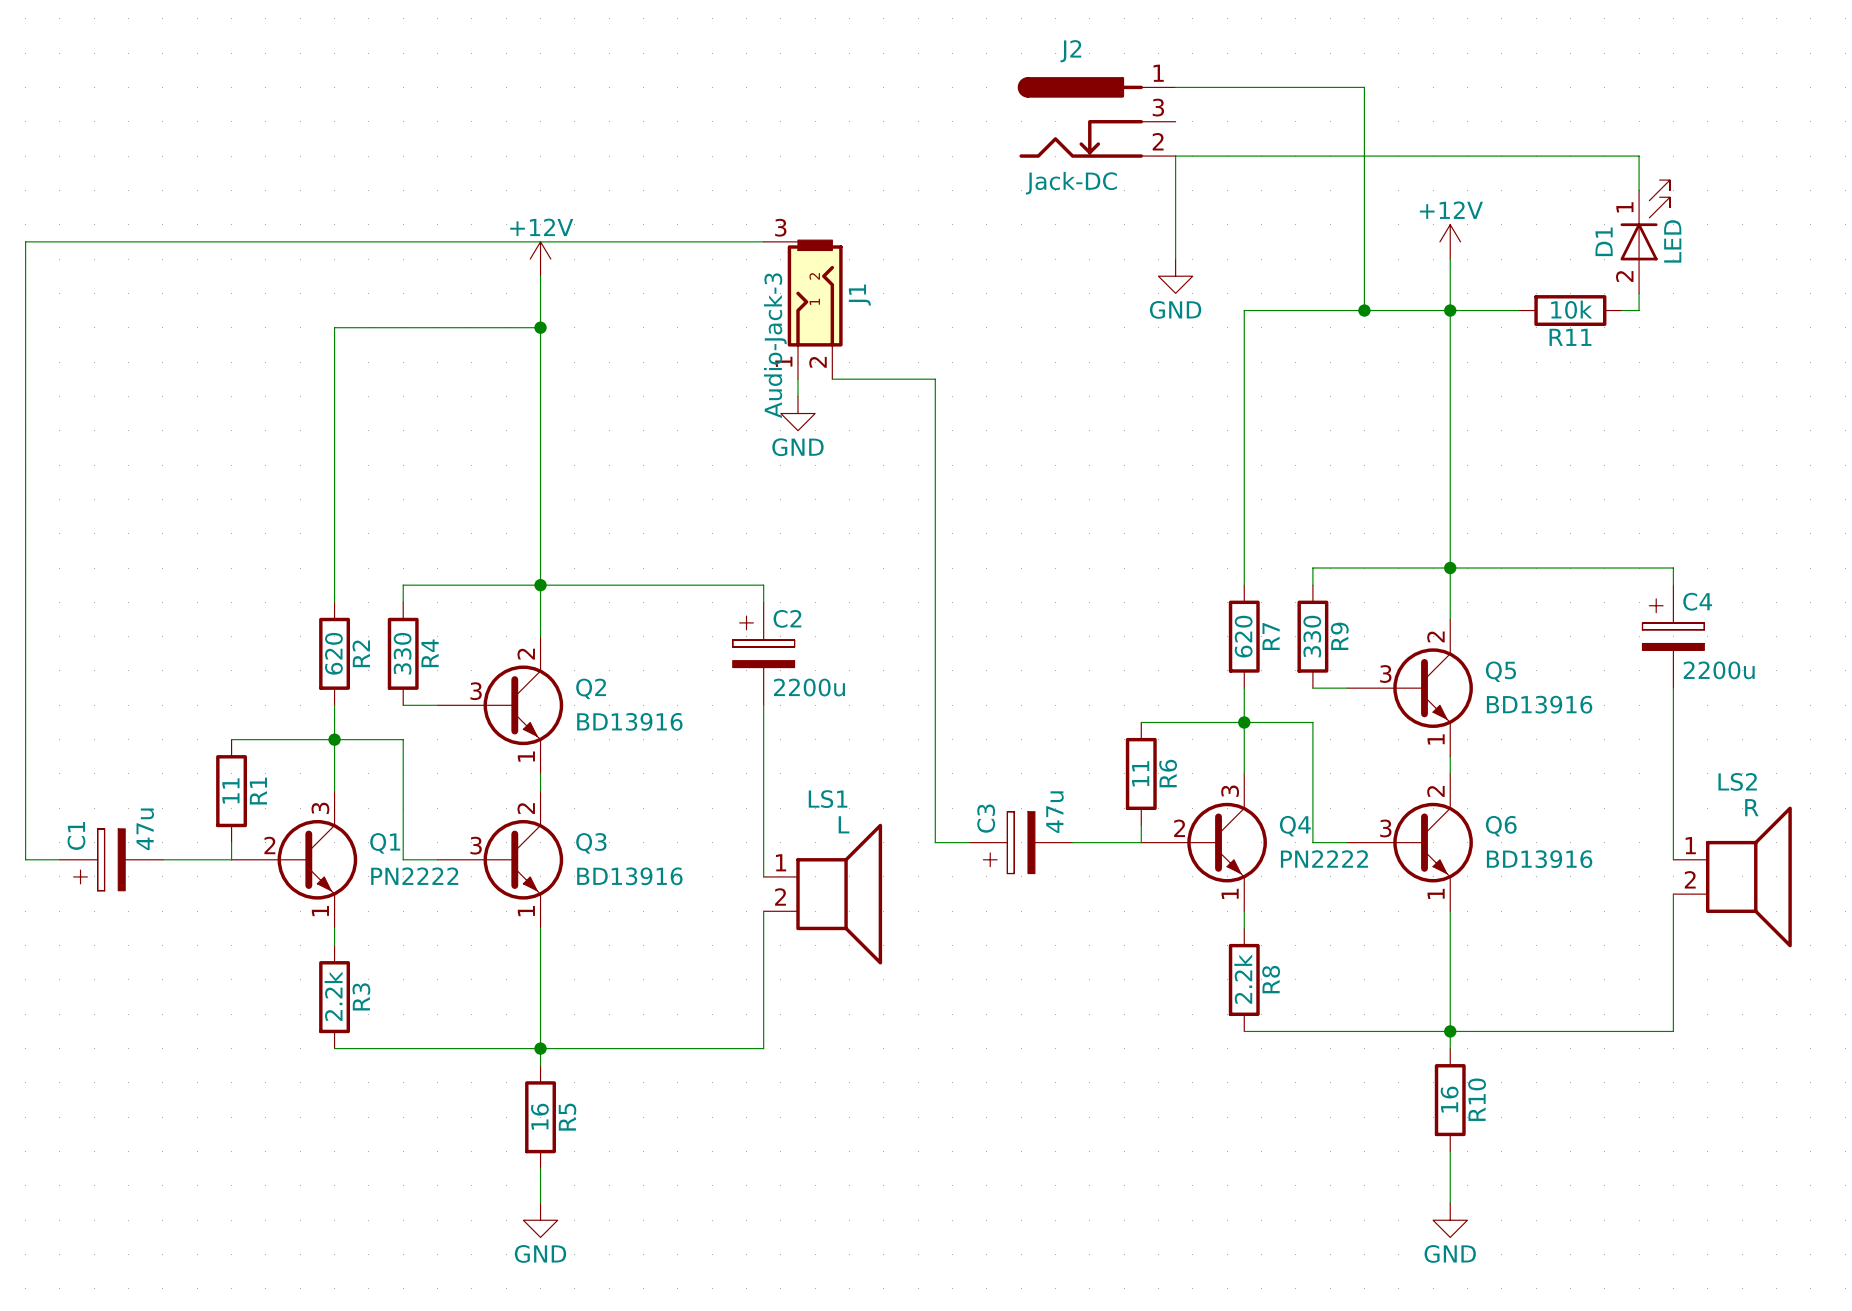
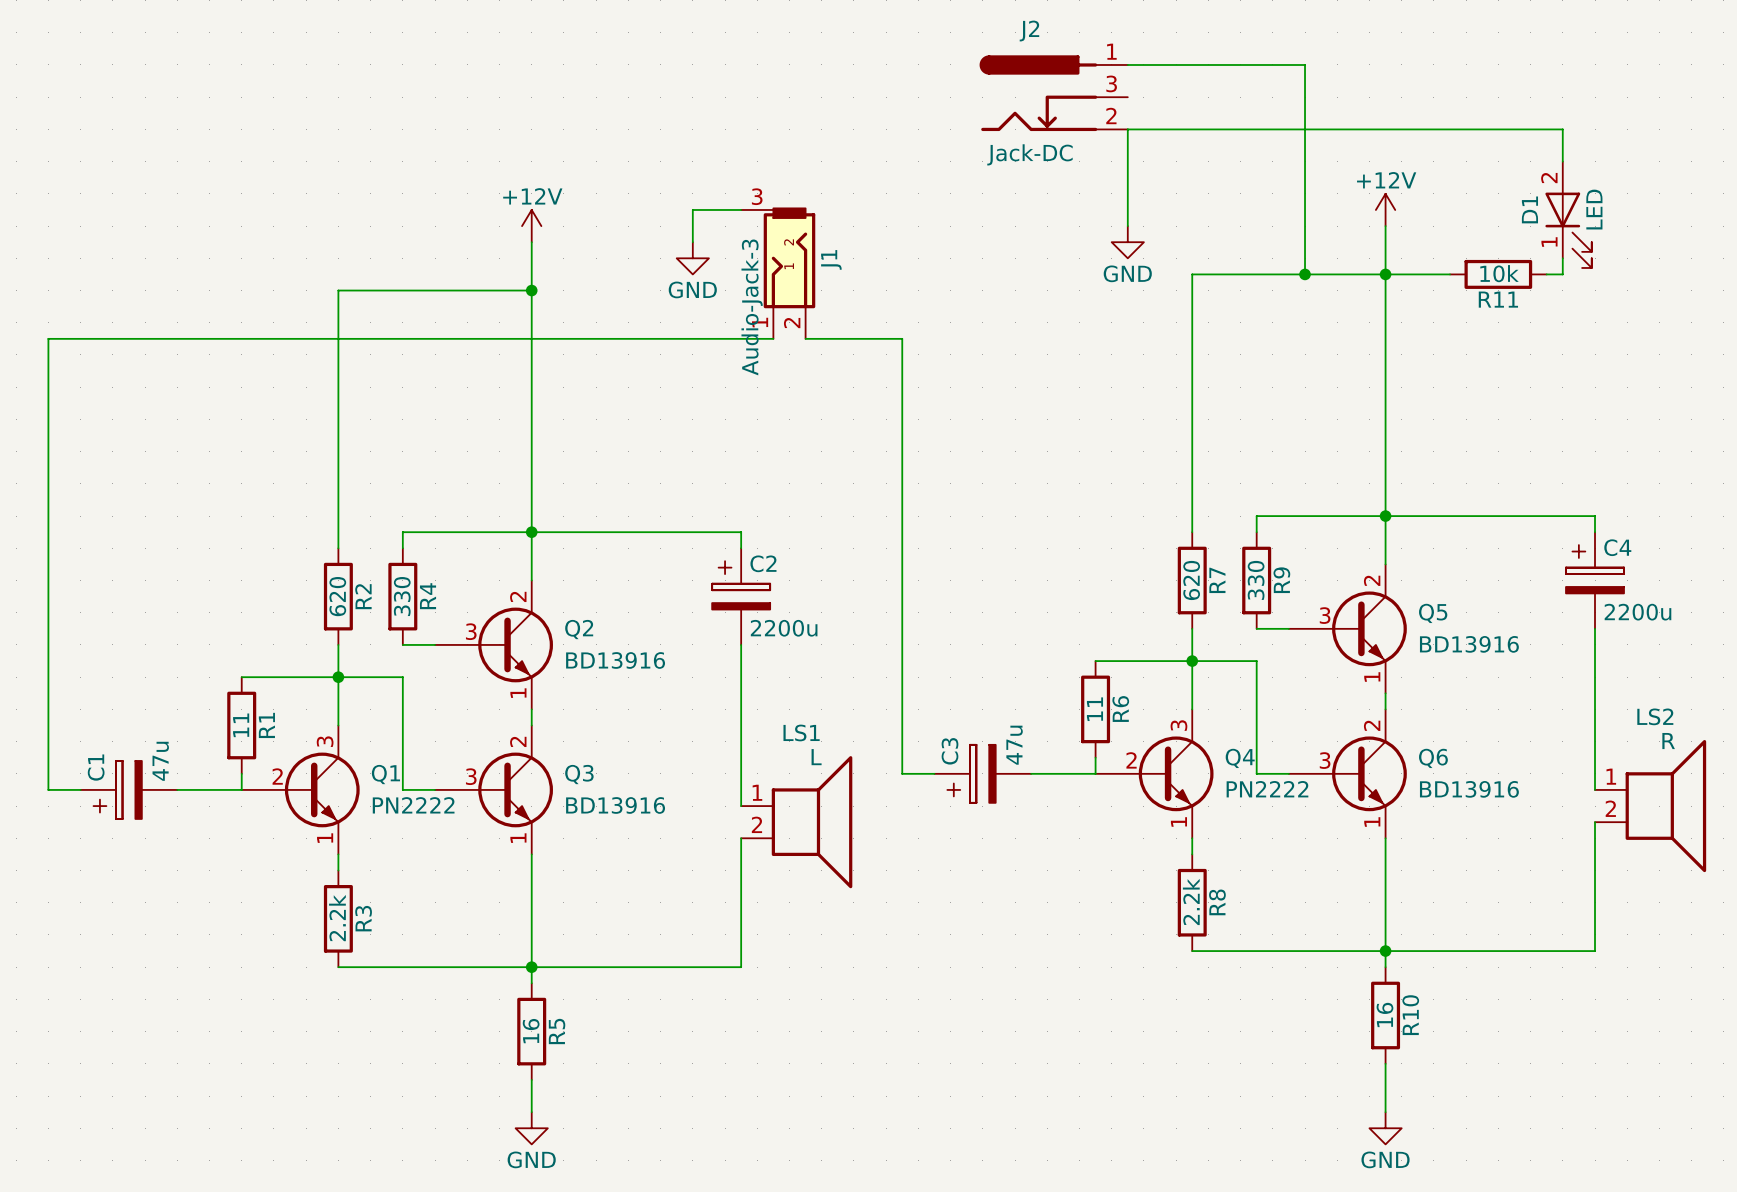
D1 flip: as is (1645, 220) -> up-down (1568, 230)
wire: (712, 241) (25, 241) (25, 379) -> (773, 338) (48, 338)
wire: none -> (692, 209) (692, 242)
wire: (798, 379) (798, 396) -> none
power symbol position: GND (798, 413) -> GND (692, 258)

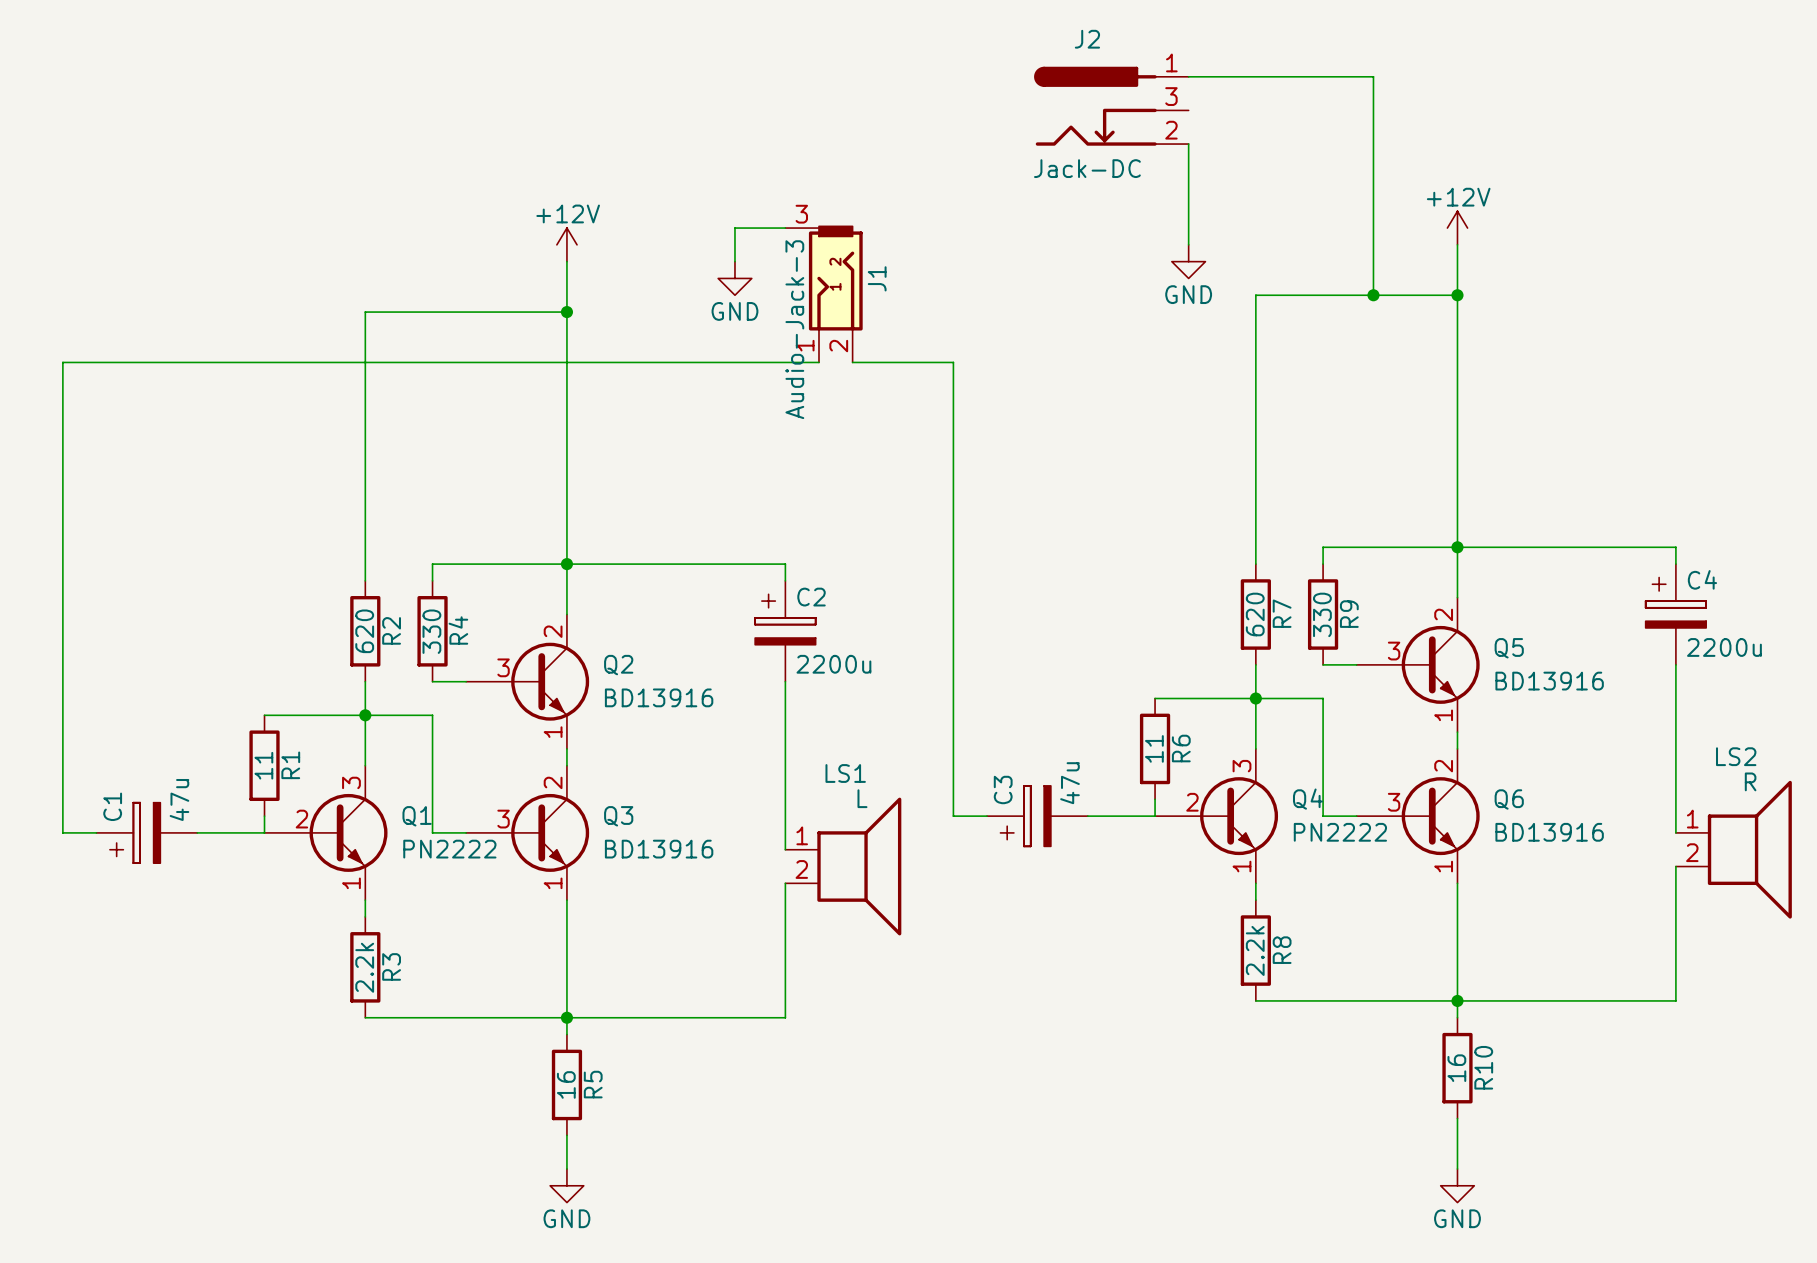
wire: (1127, 129) (1562, 129) (1562, 161) -> none
D1: LED (1568, 214) -> none
wire: (1562, 258) (1562, 274) (1546, 274) -> none
wire: (1385, 274) (1450, 274) -> none
R11: 10k (1498, 274) -> none

